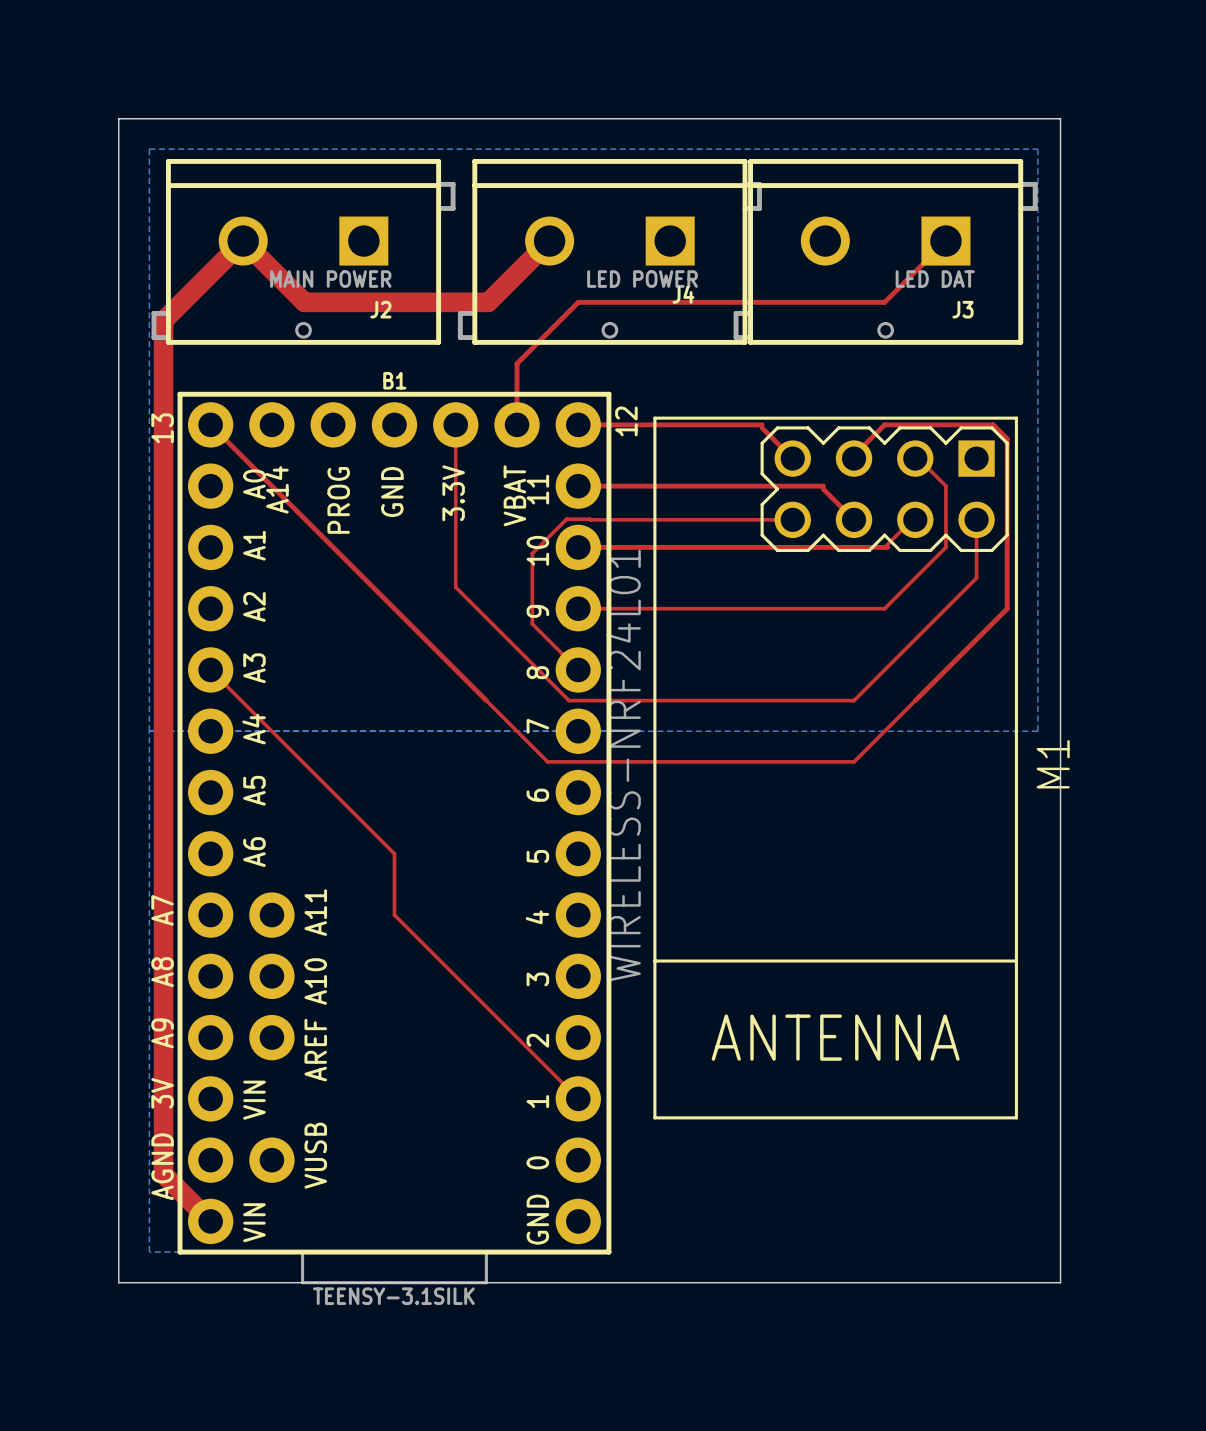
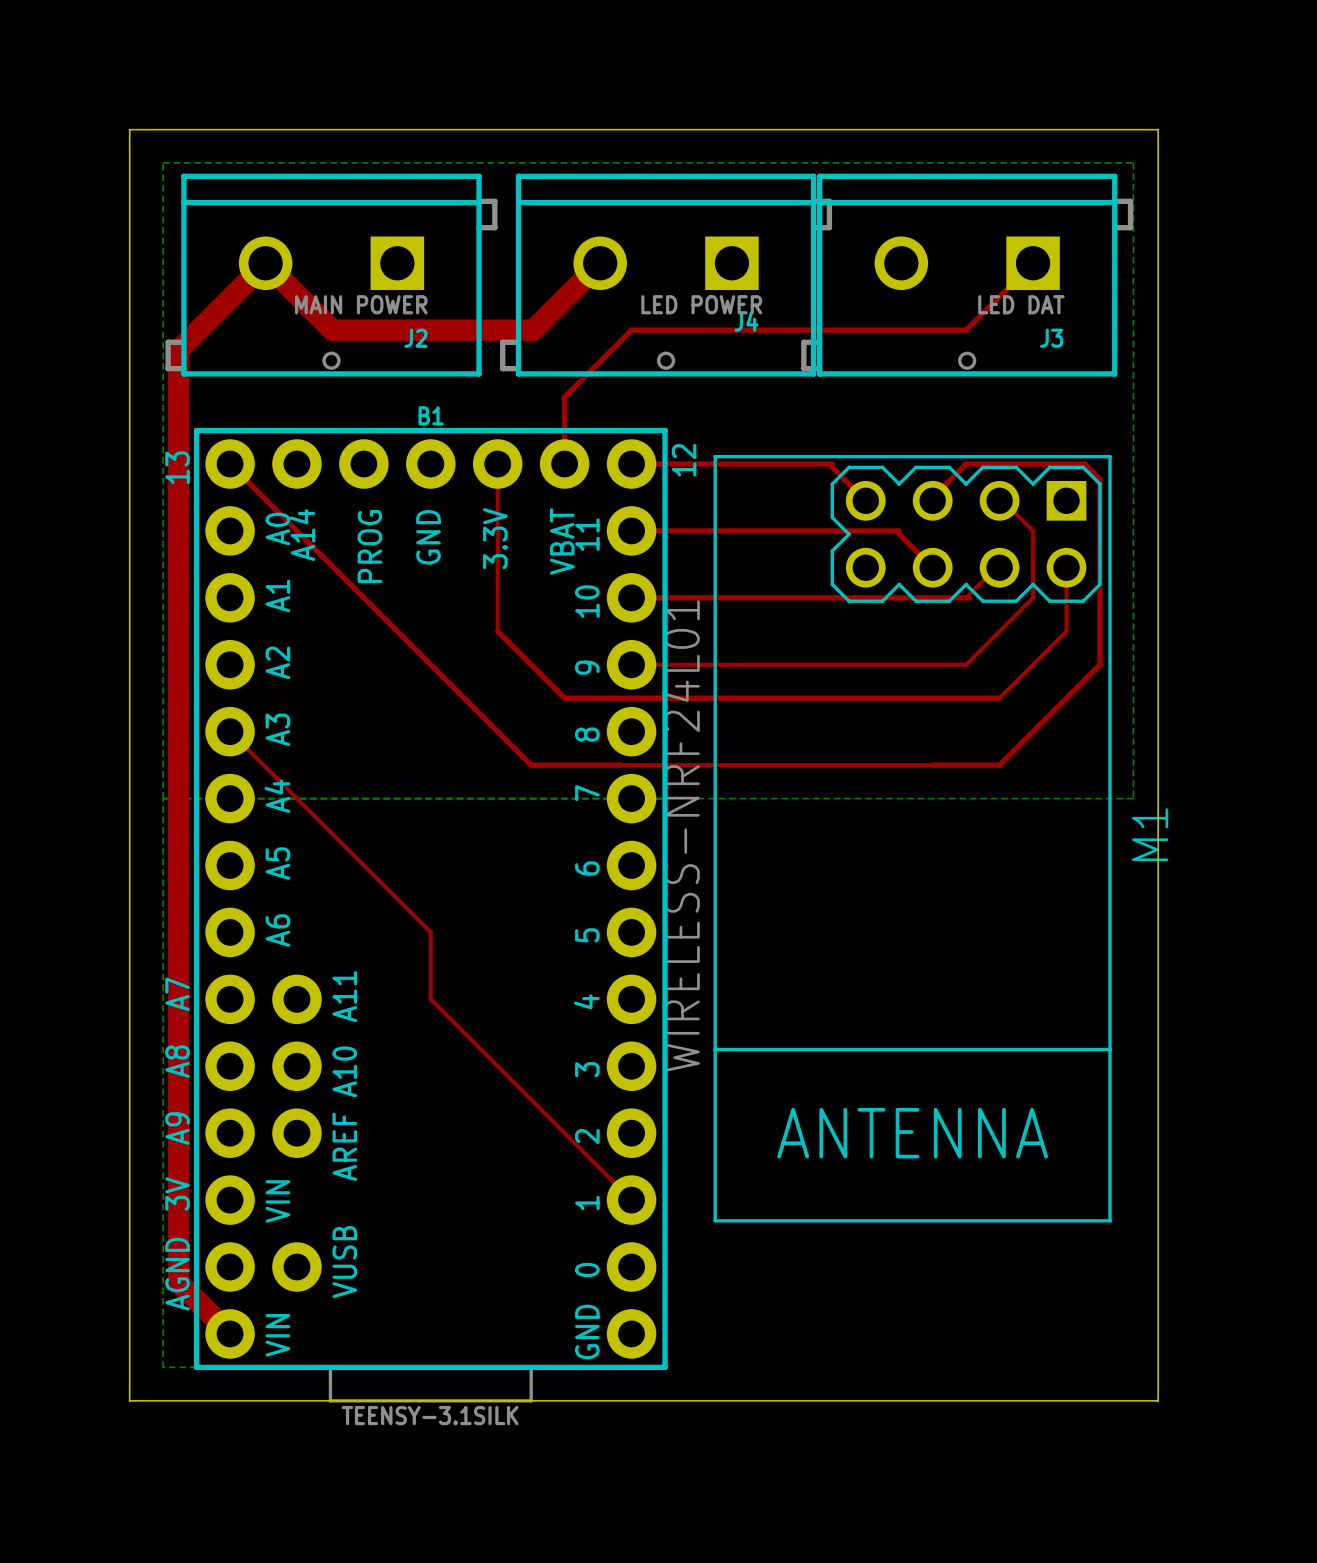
top track: (792, 519) (566, 519) (532, 553) (532, 624) (578, 669) -> none
top track: (455, 578) (455, 587) (569, 700) -> (531, 765) (621, 765)
top track: none -> (497, 631) (564, 698) (999, 698)
top track: (915, 639) (854, 700) -> (999, 765) (932, 765)
top track: (486, 700) (547, 761) (854, 761) (915, 700) -> none

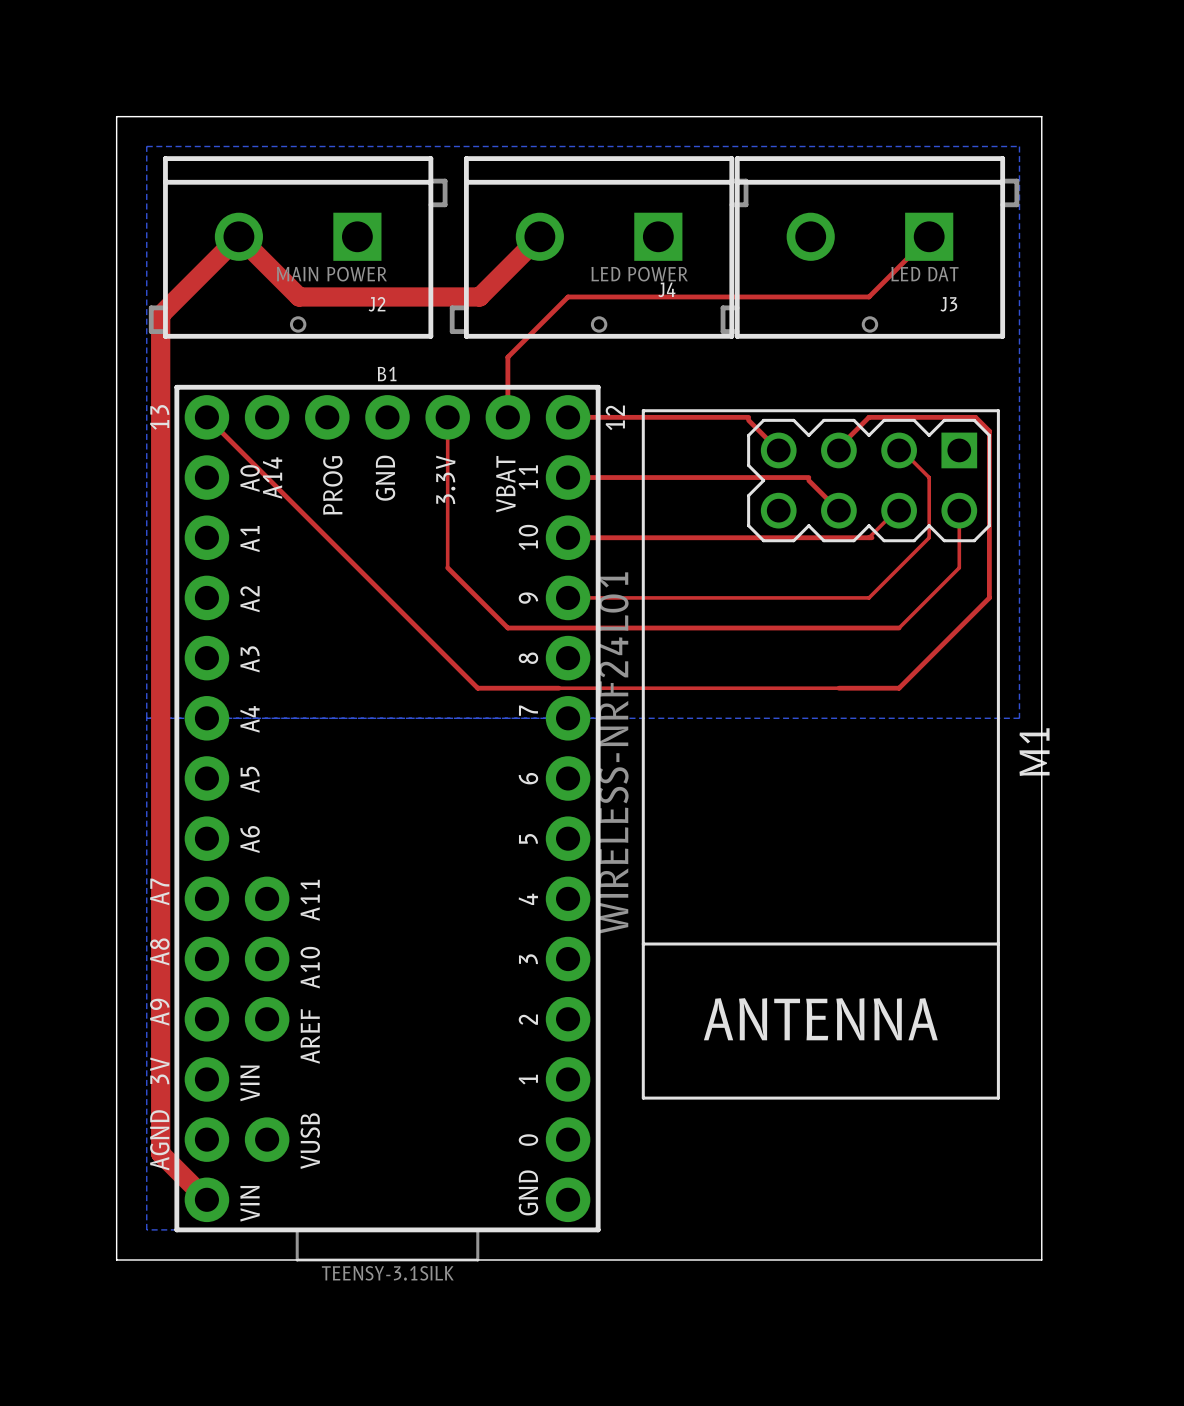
top track: (230, 731) (430, 932) (430, 999) (631, 1200) -> none

